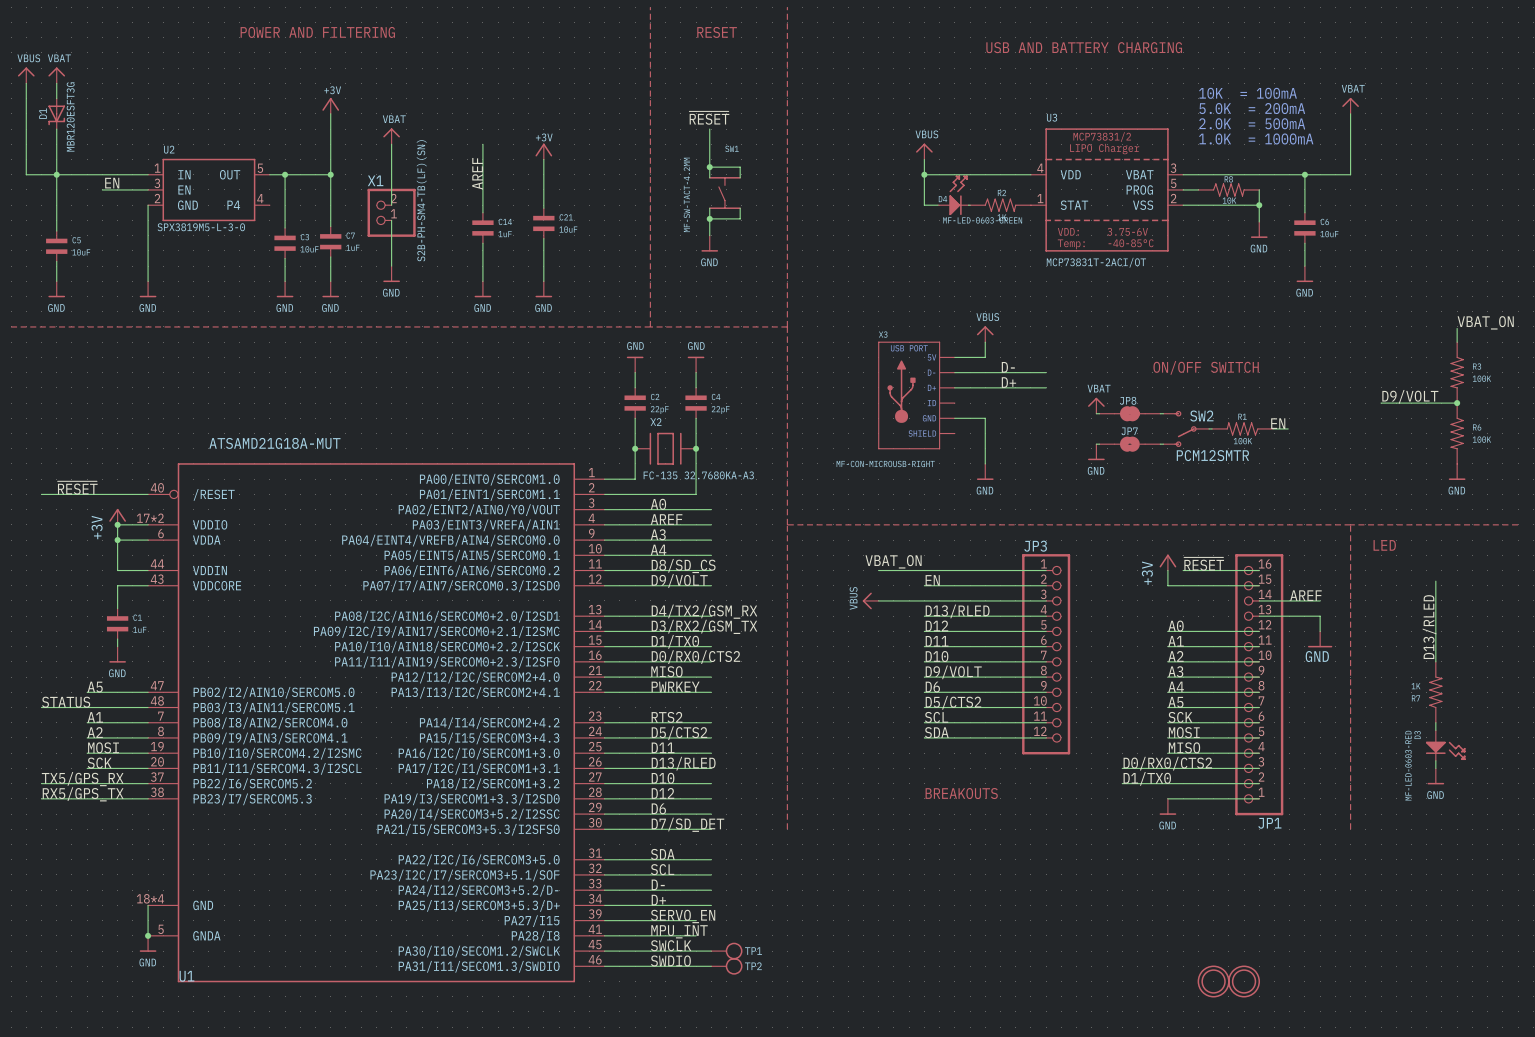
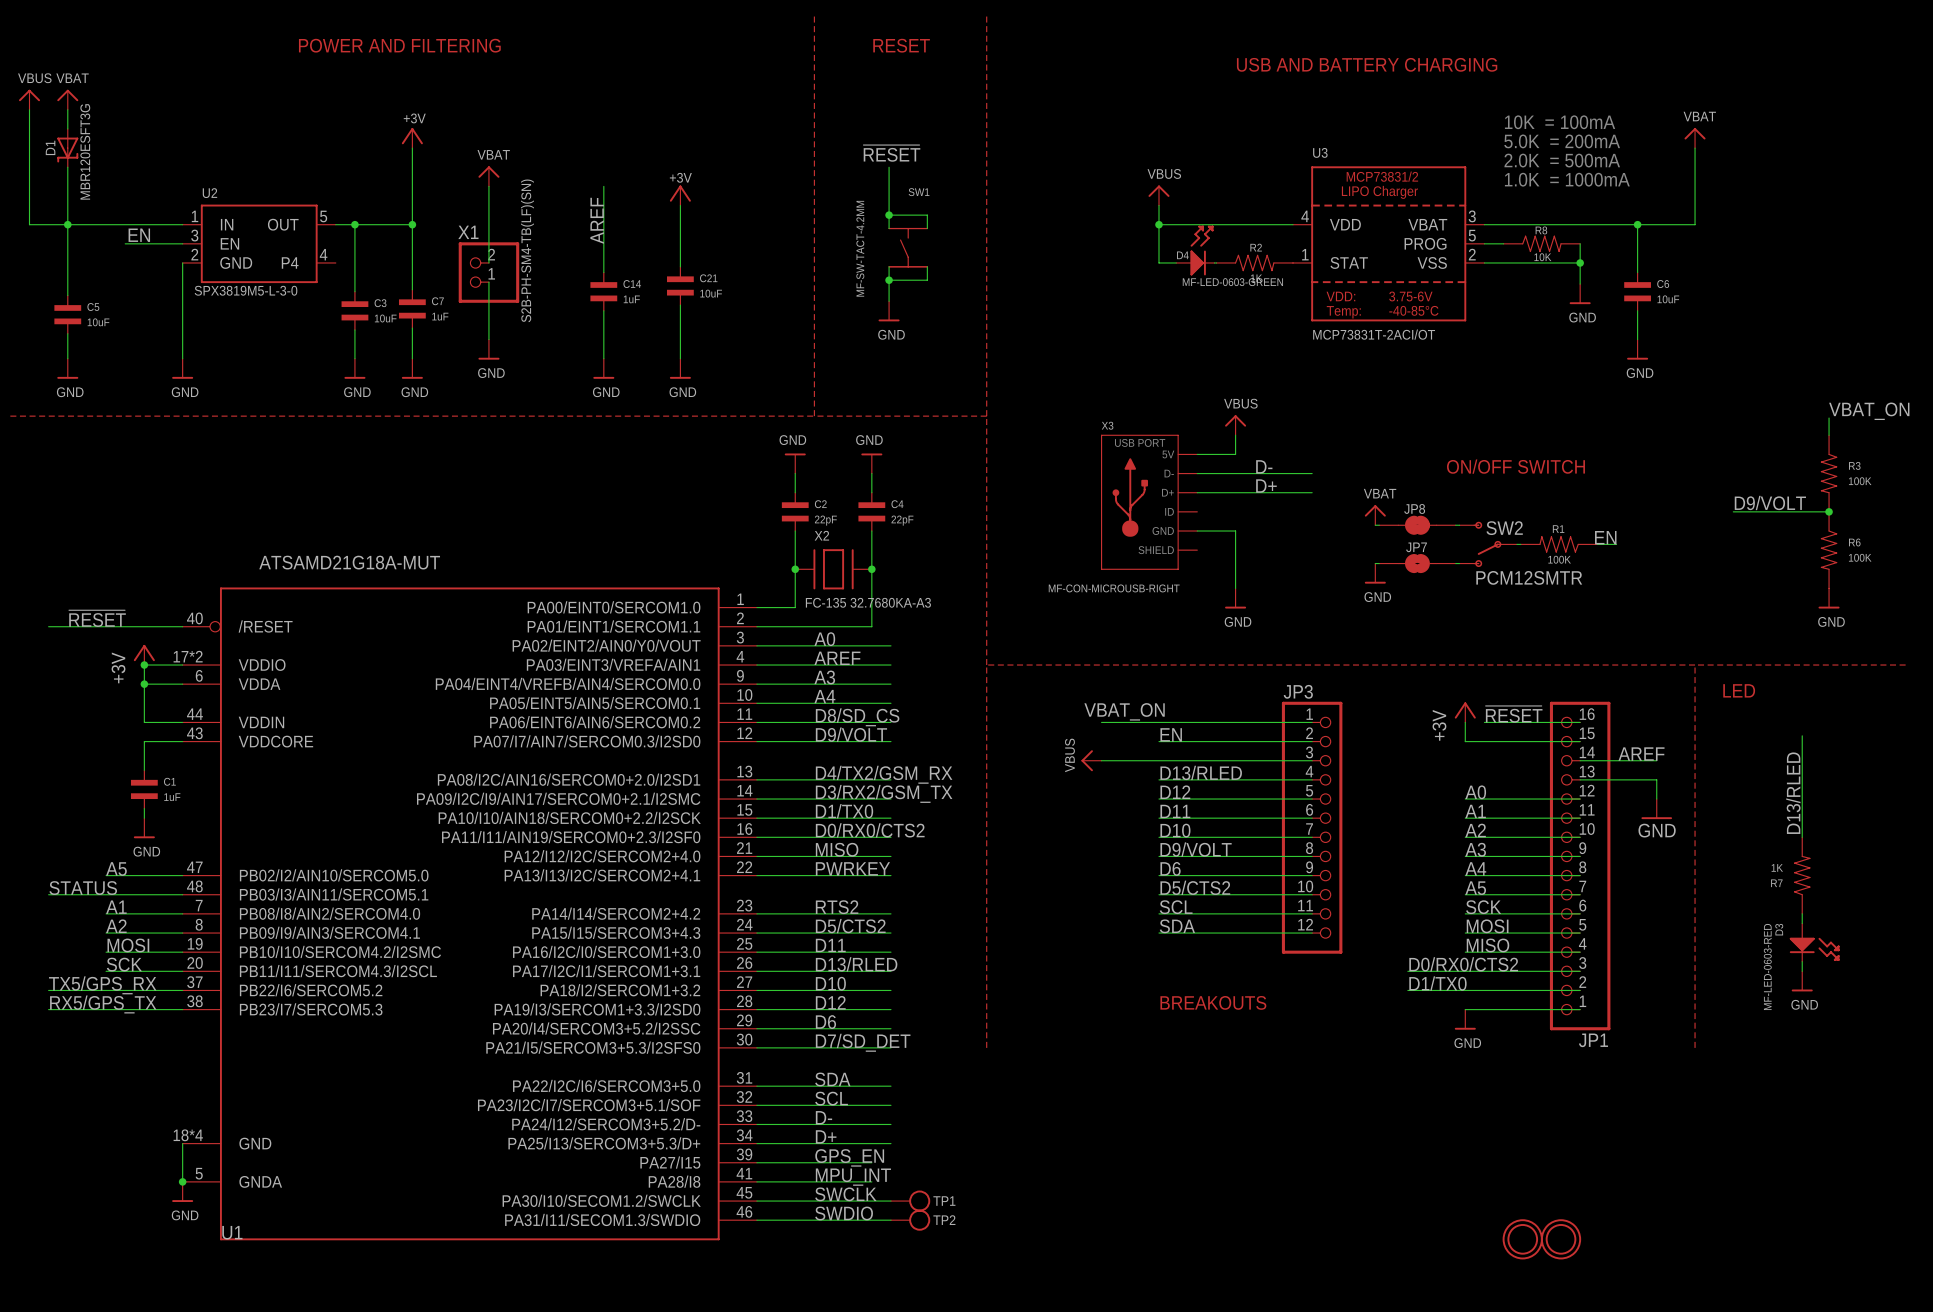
label: SERVO_EN (683, 916) -> GPS_EN (849, 1157)

